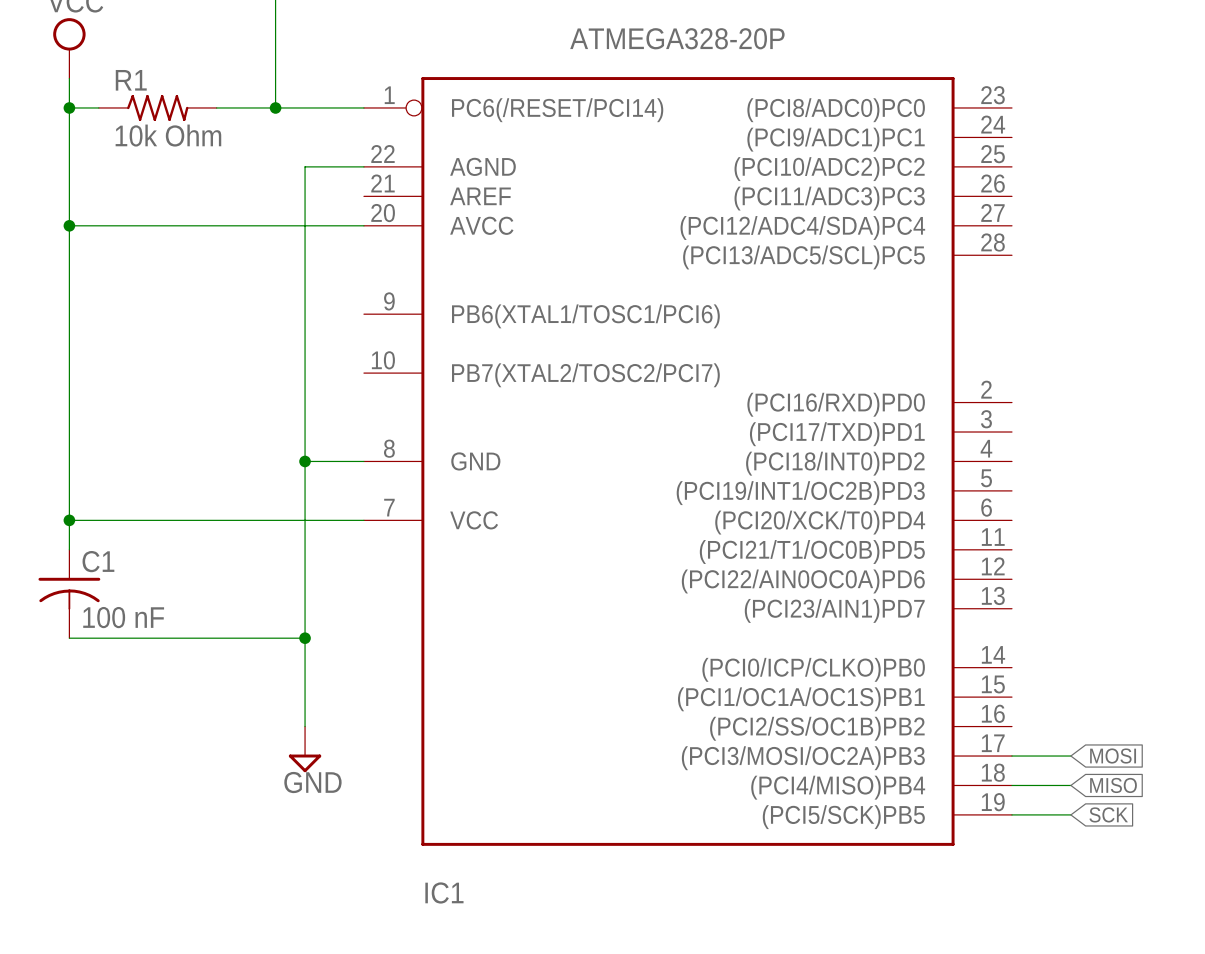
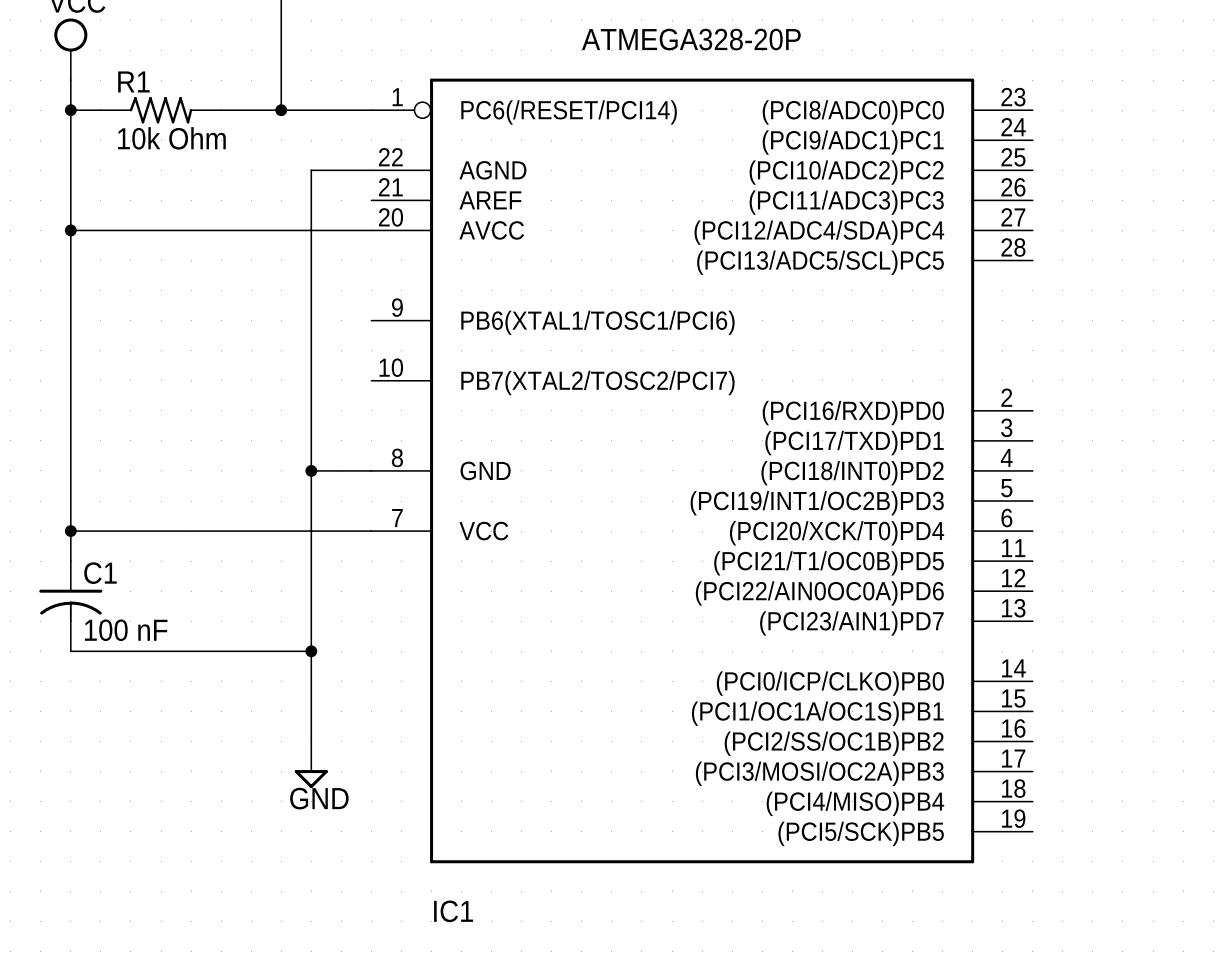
wire: (1011, 756) (1070, 756) -> none
global label: MOSI (1113, 756) -> none
wire: (1011, 785) (1070, 785) -> none
global label: MISO (1113, 785) -> none
wire: (1011, 814) (1070, 814) -> none
global label: SCK (1108, 814) -> none

